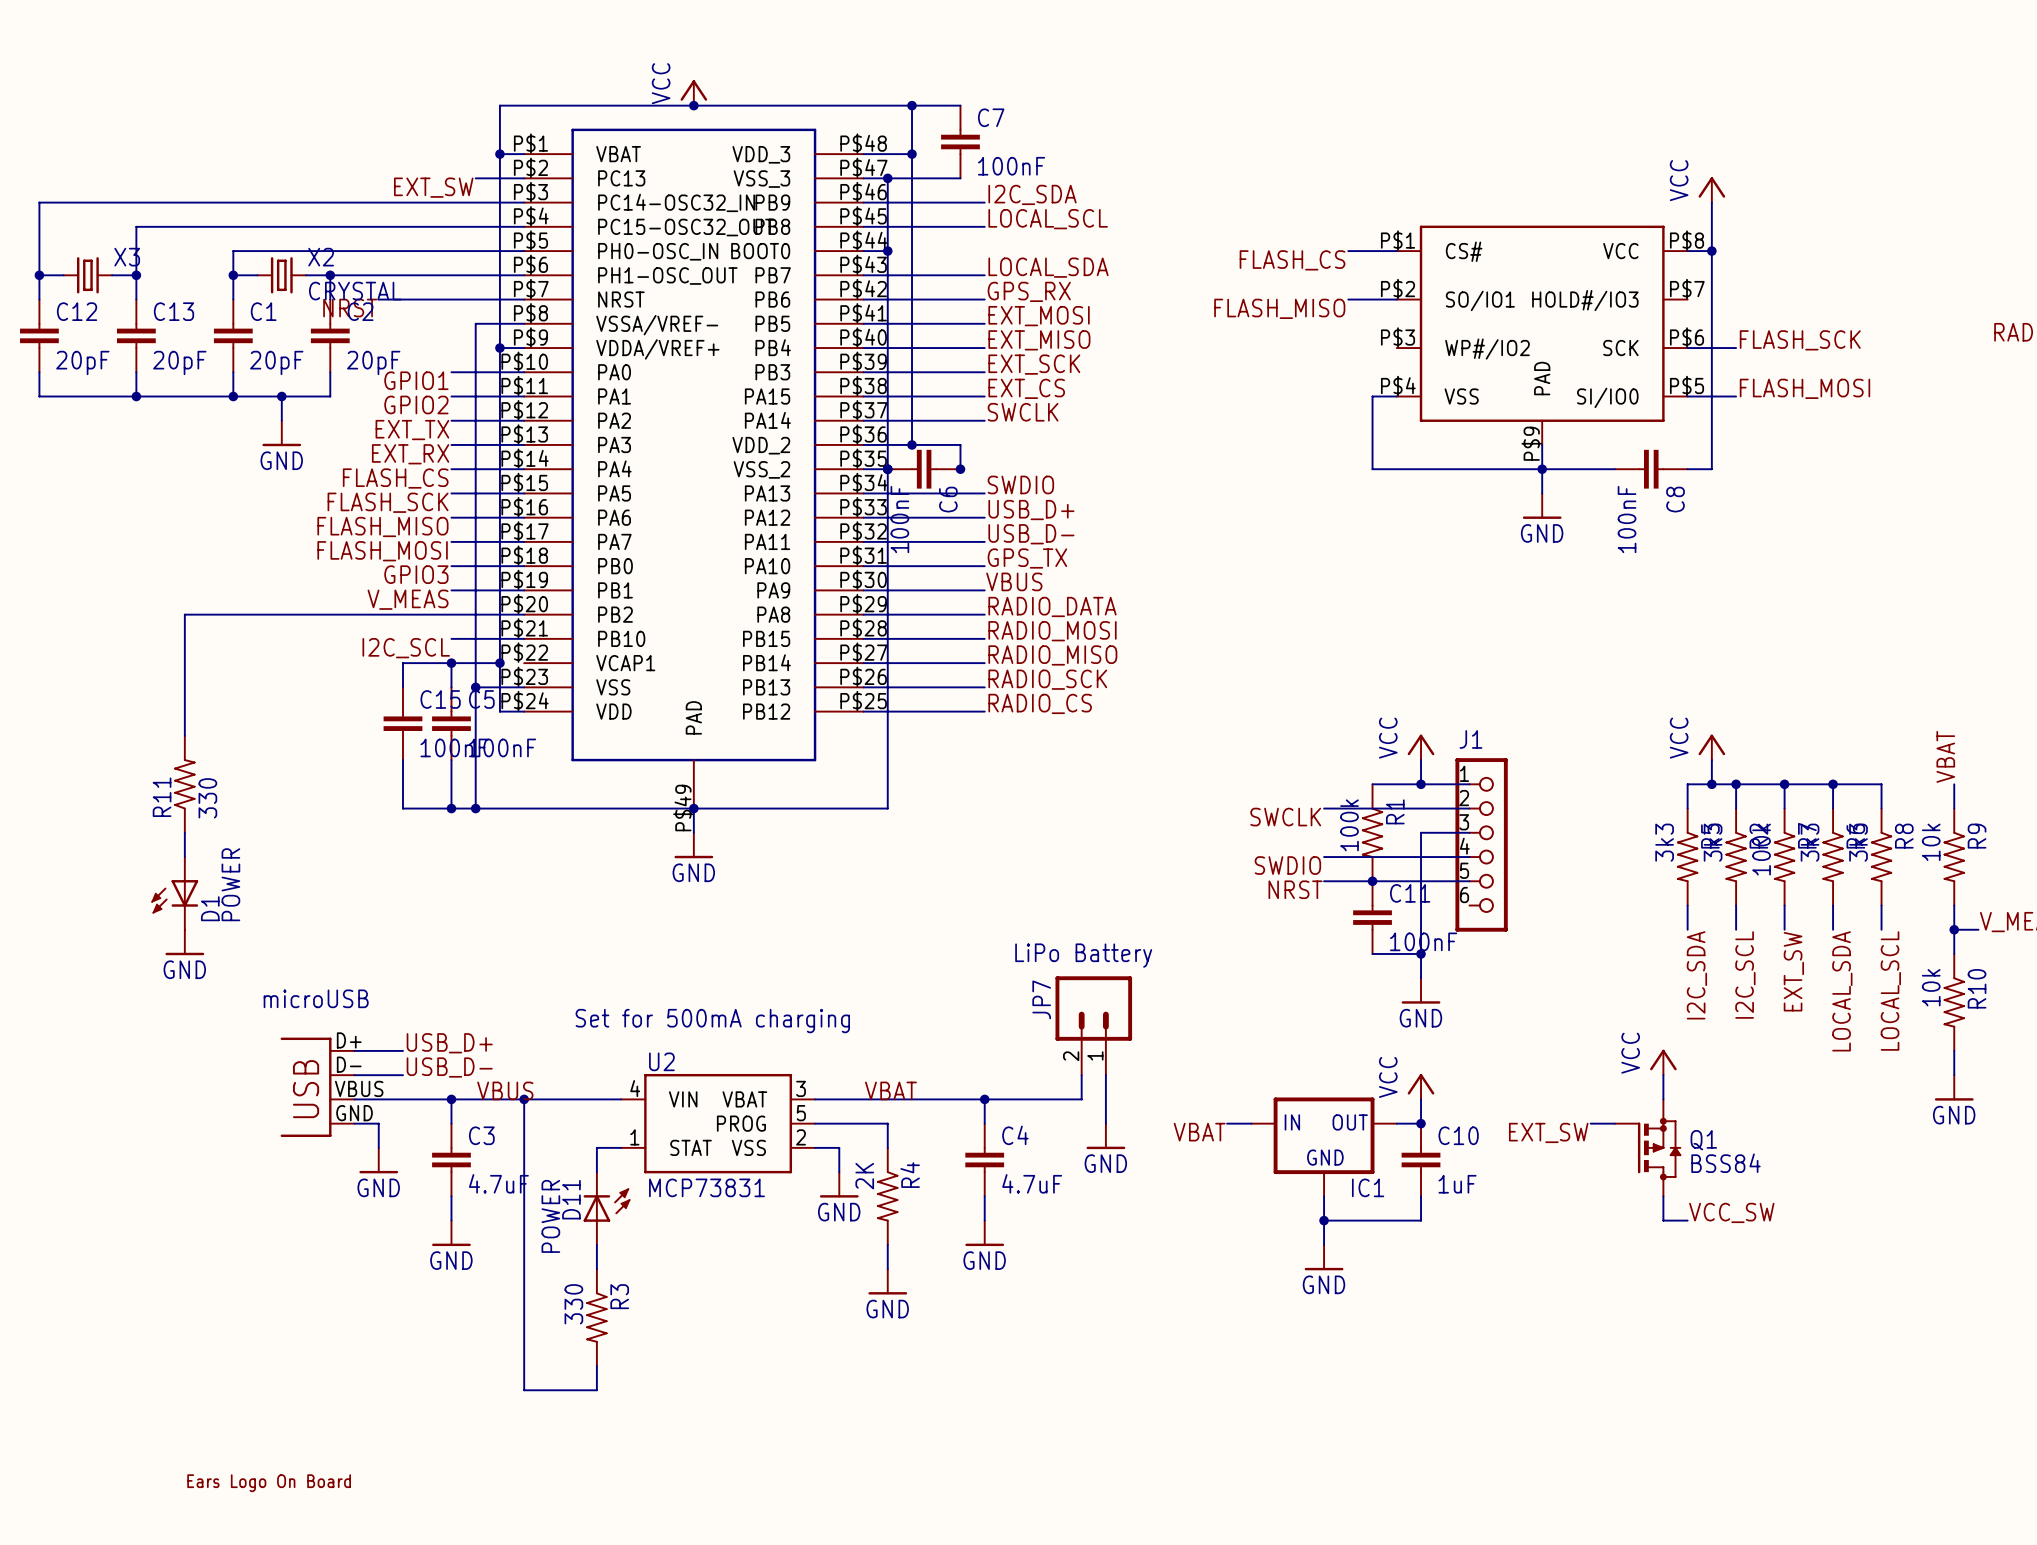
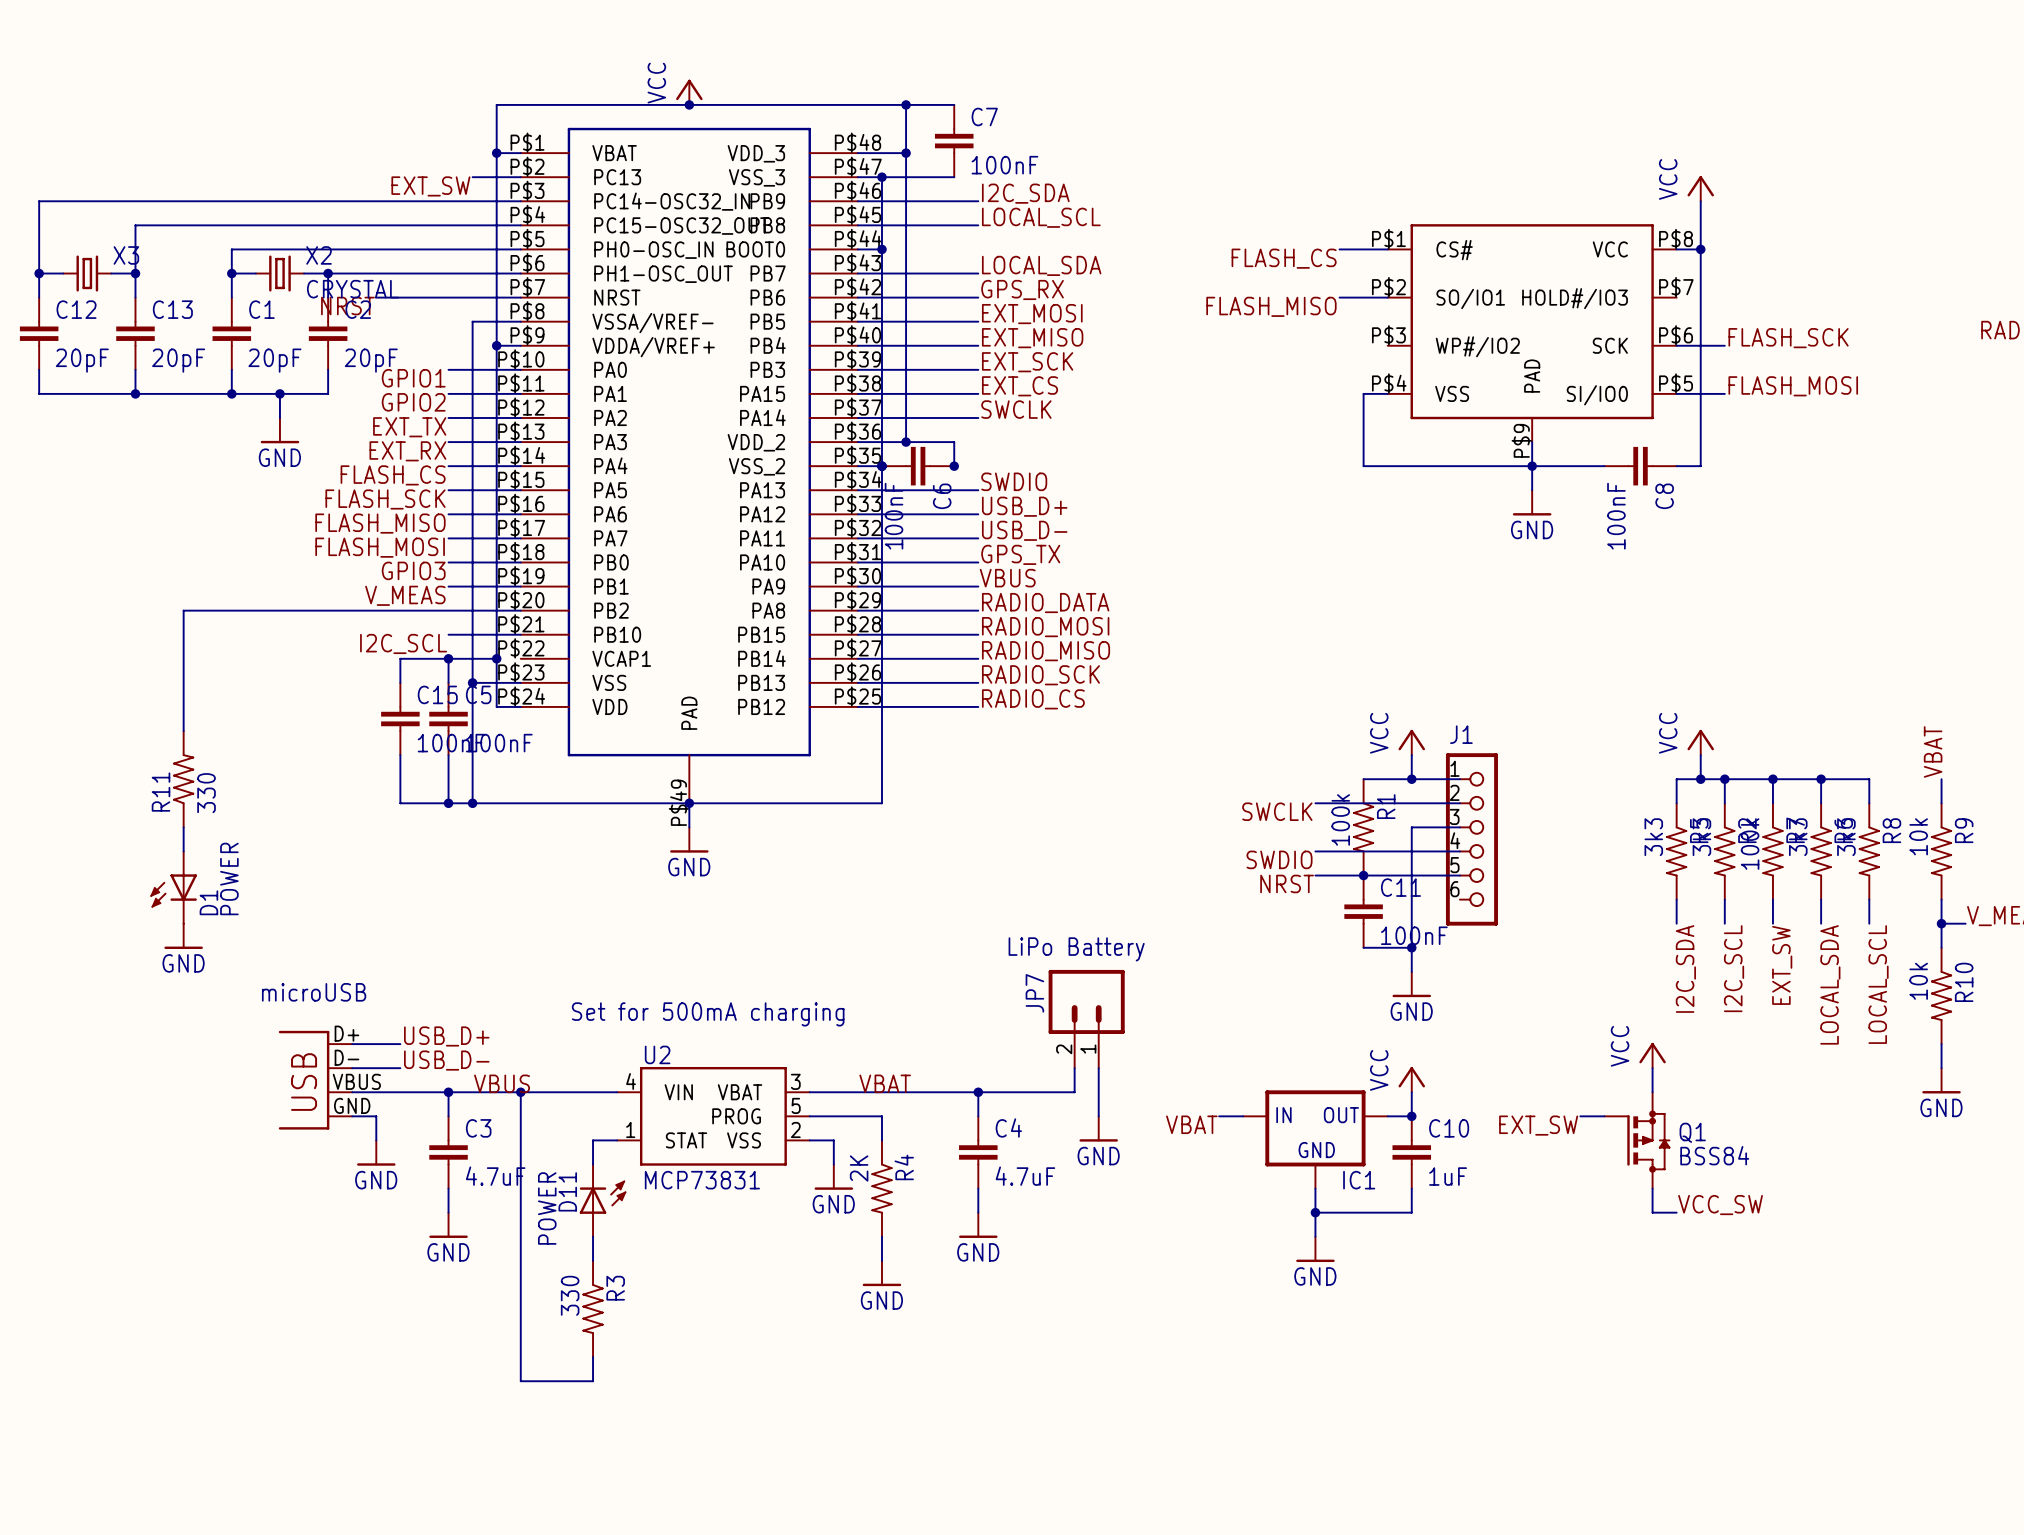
part: (269, 1483) -> none

